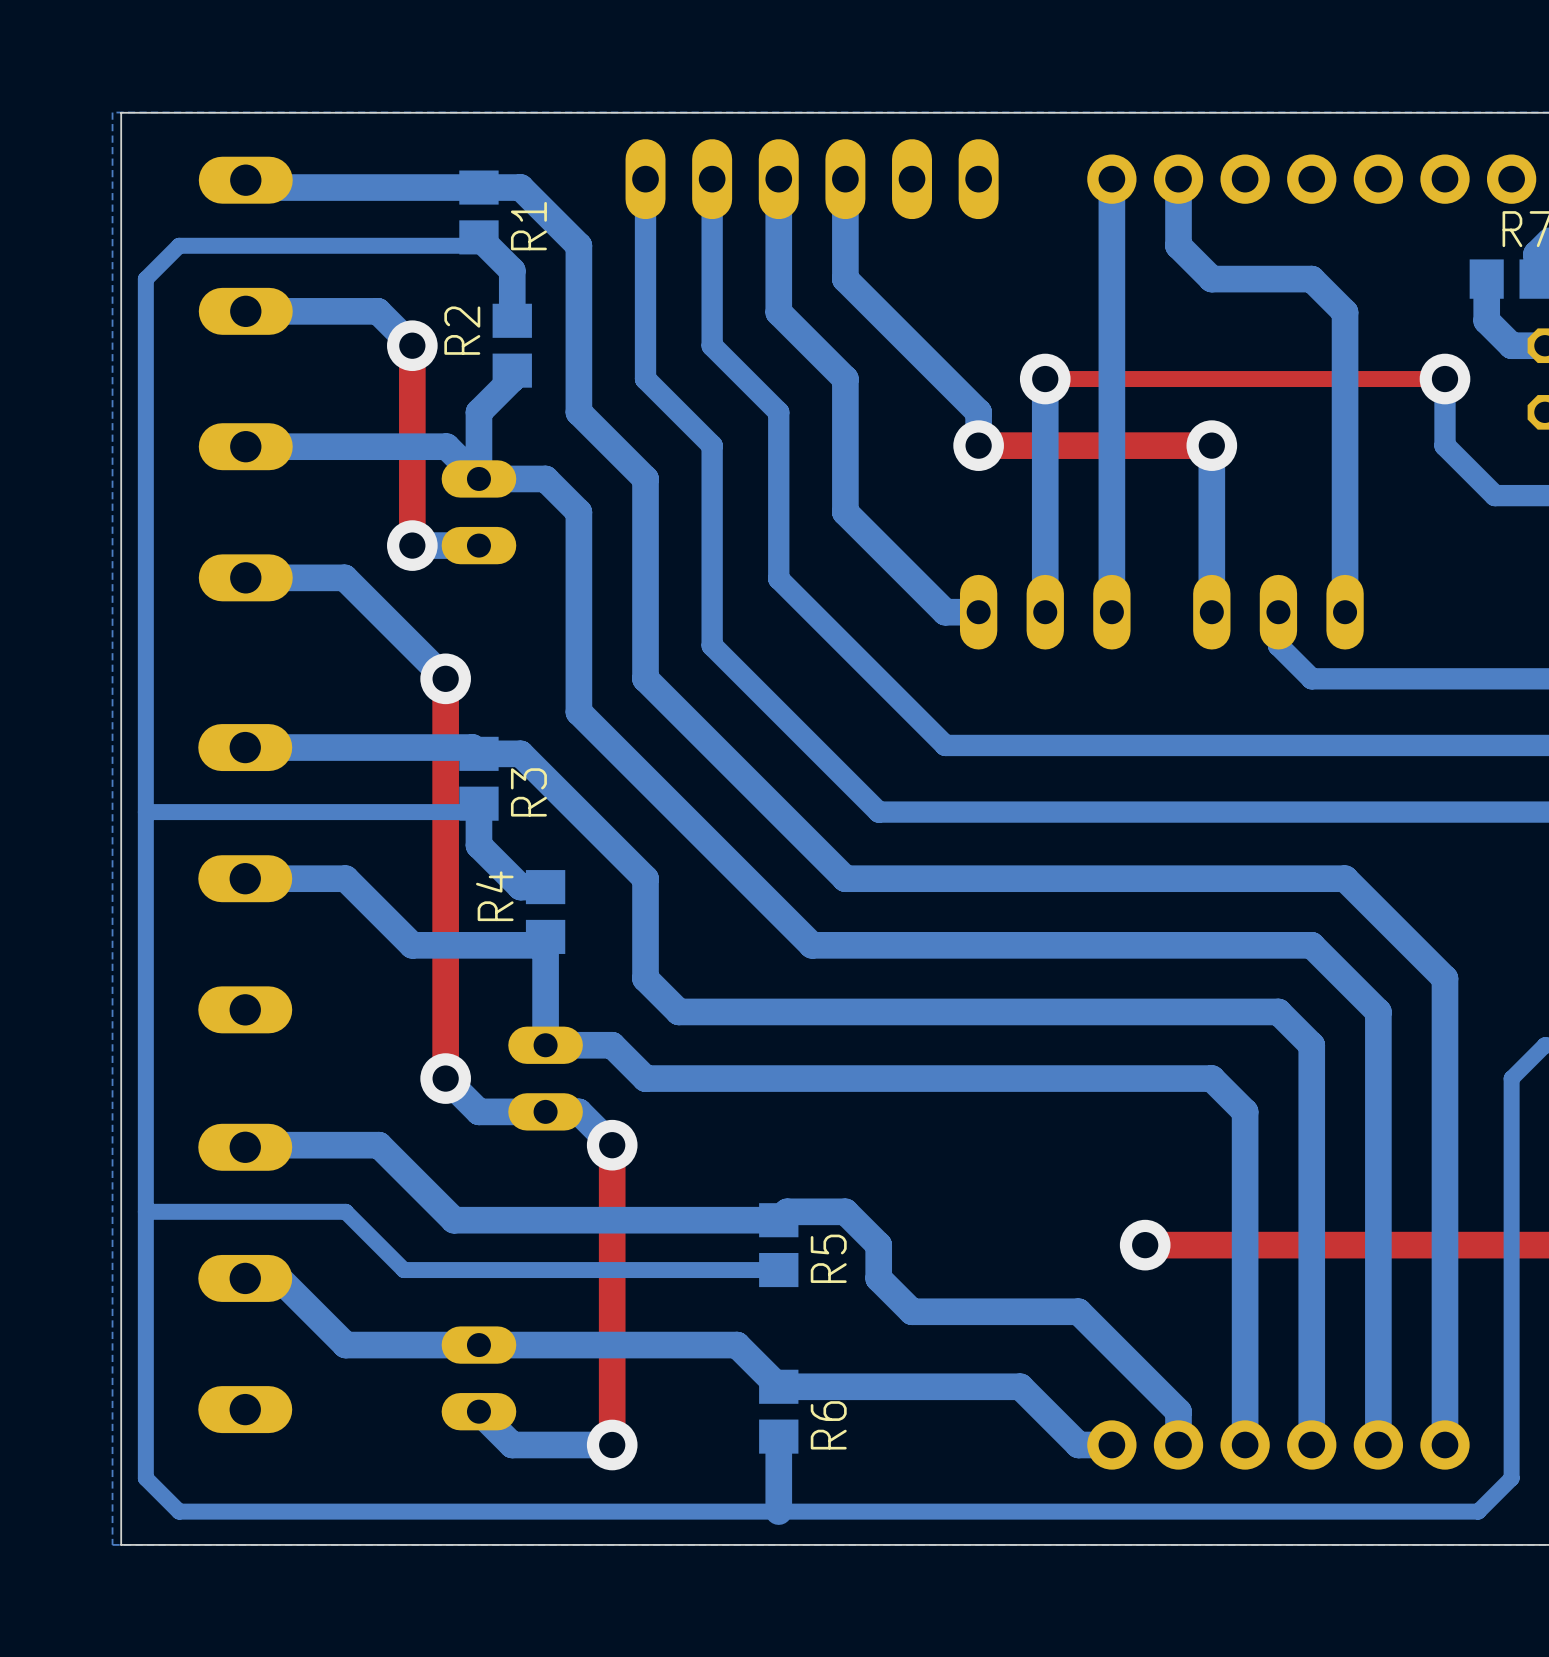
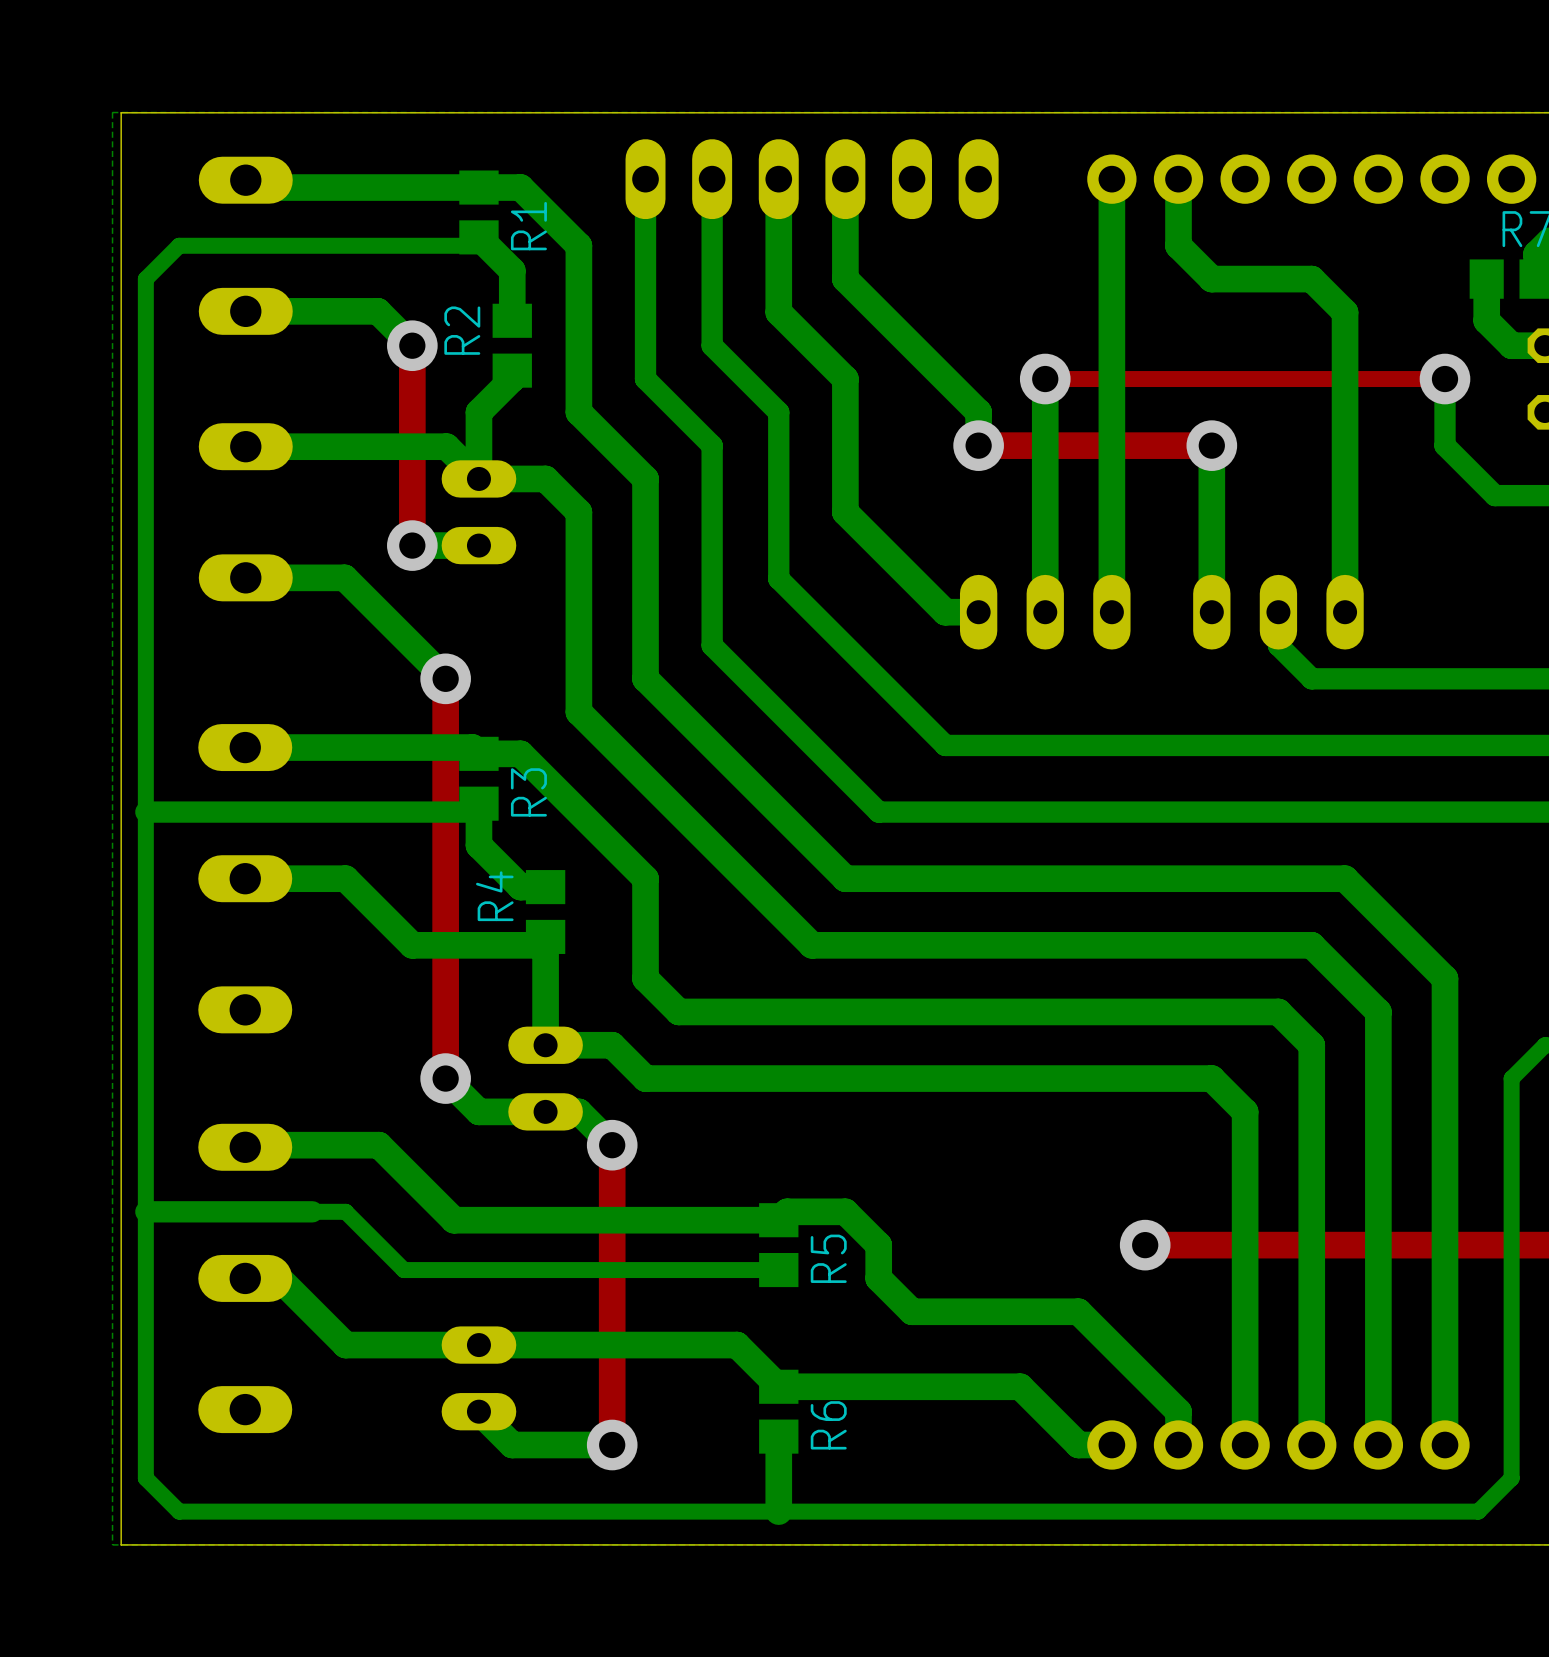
bottom track width: thin (470, 812) (145, 812) -> thick (470, 812) (145, 812)
bottom track width: thin (312, 1211) (145, 1211) -> thick (312, 1211) (145, 1211)

